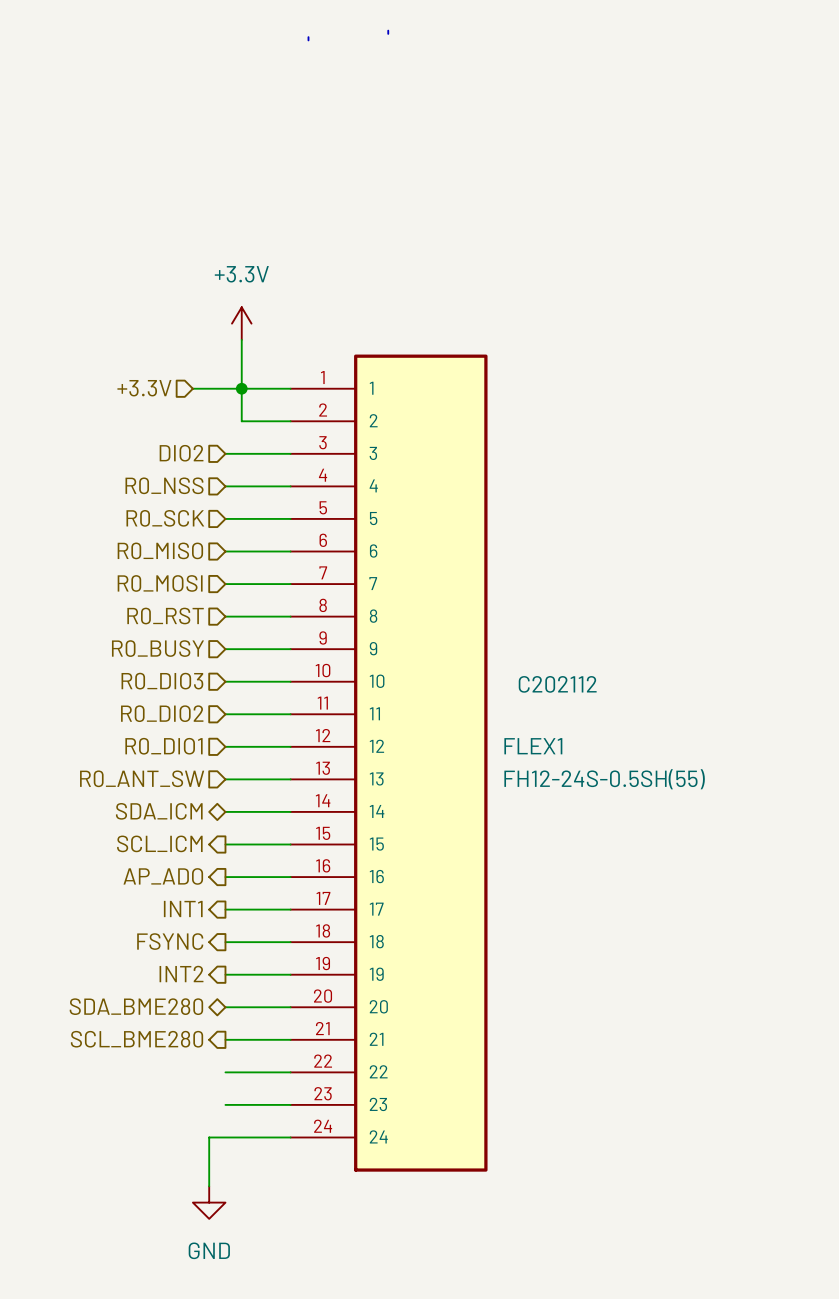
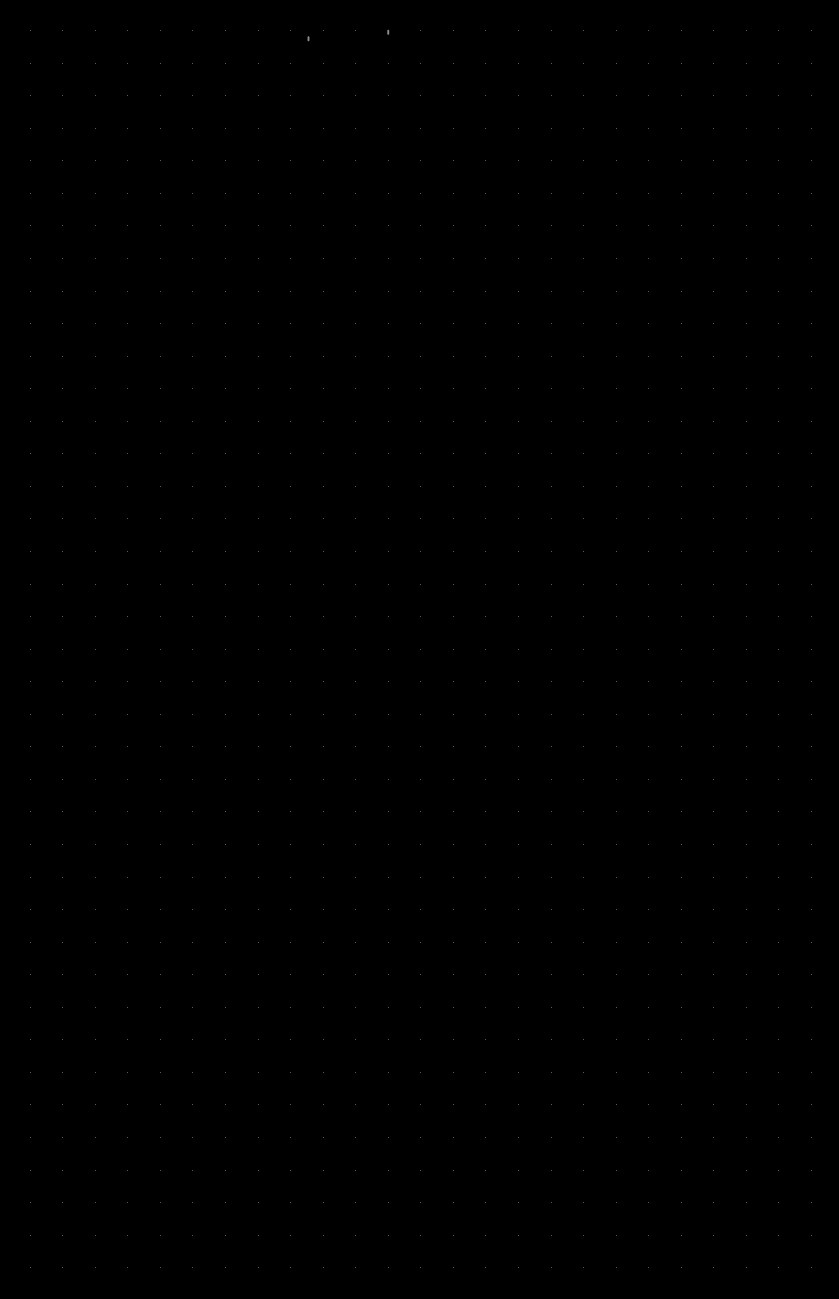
power symbol: +3.3V (241, 323) -> none
wire: (241, 339) (241, 421) (290, 421) -> none
hierarchical label: +3.3V (144, 388) -> none
wire: (192, 388) (290, 388) -> none
junction: (241, 388) -> none
hierarchical label: DIO2 (181, 453) -> none
wire: (225, 453) (290, 453) -> none
hierarchical label: R0_NSS (164, 485) -> none
wire: (225, 486) (290, 486) -> none
hierarchical label: R0_SCK (165, 518) -> none
wire: (225, 518) (290, 518) -> none
hierarchical label: R0_MISO (160, 550) -> none
wire: (225, 551) (290, 551) -> none
hierarchical label: R0_MOSI (160, 583) -> none
wire: (225, 584) (290, 584) -> none
hierarchical label: R0_RST (165, 616) -> none
wire: (225, 616) (290, 616) -> none
hierarchical label: R0_BUSY (157, 648) -> none
wire: (225, 649) (290, 649) -> none
hierarchical label: R0_DIO3 (162, 681) -> none
wire: (225, 681) (290, 681) -> none
hierarchical label: R0_DIO2 (162, 713) -> none
wire: (225, 714) (290, 714) -> none
hierarchical label: R0_DIO1 (164, 746) -> none
wire: (225, 746) (290, 746) -> none
FLEX1: FH12-24S-0.5SH(55) (389, 763) -> none
hierarchical label: R0_ANT_SW (142, 778) -> none
wire: (225, 779) (290, 779) -> none
hierarchical label: SDA_ICM (159, 811) -> none
wire: (225, 811) (290, 811) -> none
hierarchical label: SCL_ICM (159, 843) -> none
wire: (225, 844) (290, 844) -> none
hierarchical label: AP_ADO (163, 876) -> none
wire: (225, 877) (290, 877) -> none
hierarchical label: INT1 (183, 908) -> none
wire: (225, 909) (290, 909) -> none
hierarchical label: FSYNC (170, 941) -> none
wire: (225, 942) (290, 942) -> none
hierarchical label: INT2 (181, 974) -> none
wire: (225, 974) (290, 974) -> none
hierarchical label: SDA_BME280 (136, 1006) -> none
wire: (225, 1007) (290, 1007) -> none
hierarchical label: SCL_BME280 (137, 1039) -> none
wire: (225, 1039) (290, 1039) -> none
wire: (225, 1072) (290, 1072) -> none
wire: (225, 1104) (290, 1104) -> none
wire: (290, 1137) (209, 1137) (209, 1186) -> none
power symbol: GND (209, 1202) -> none

